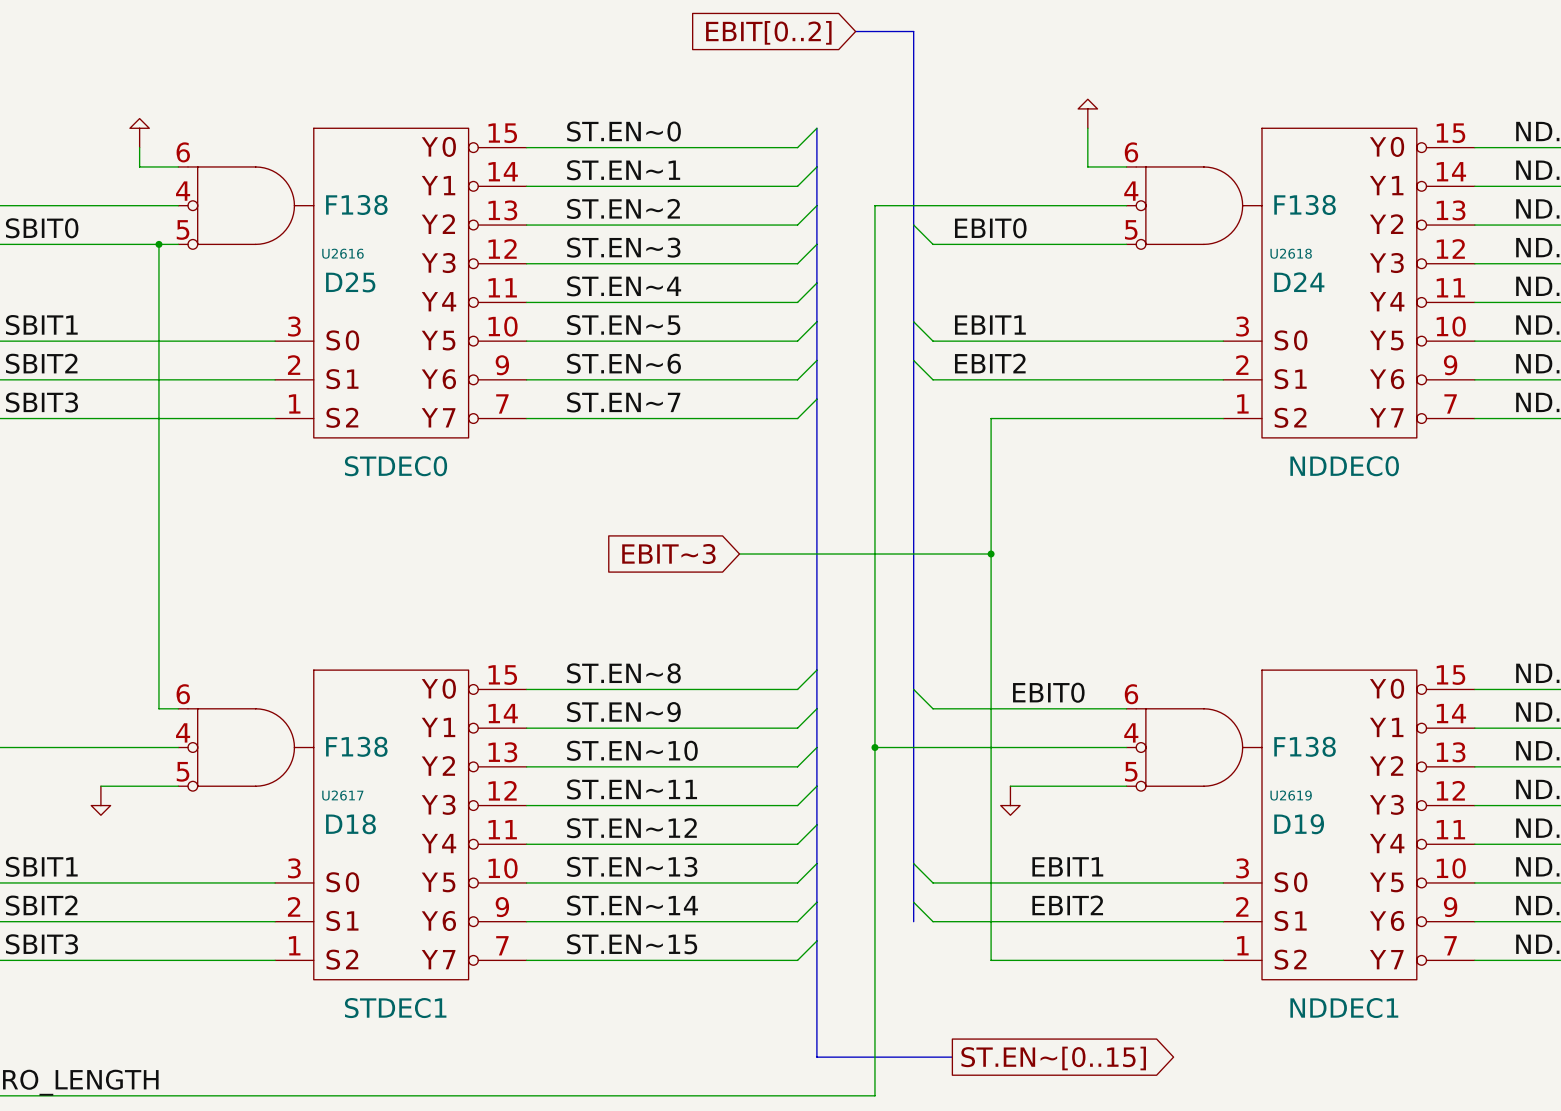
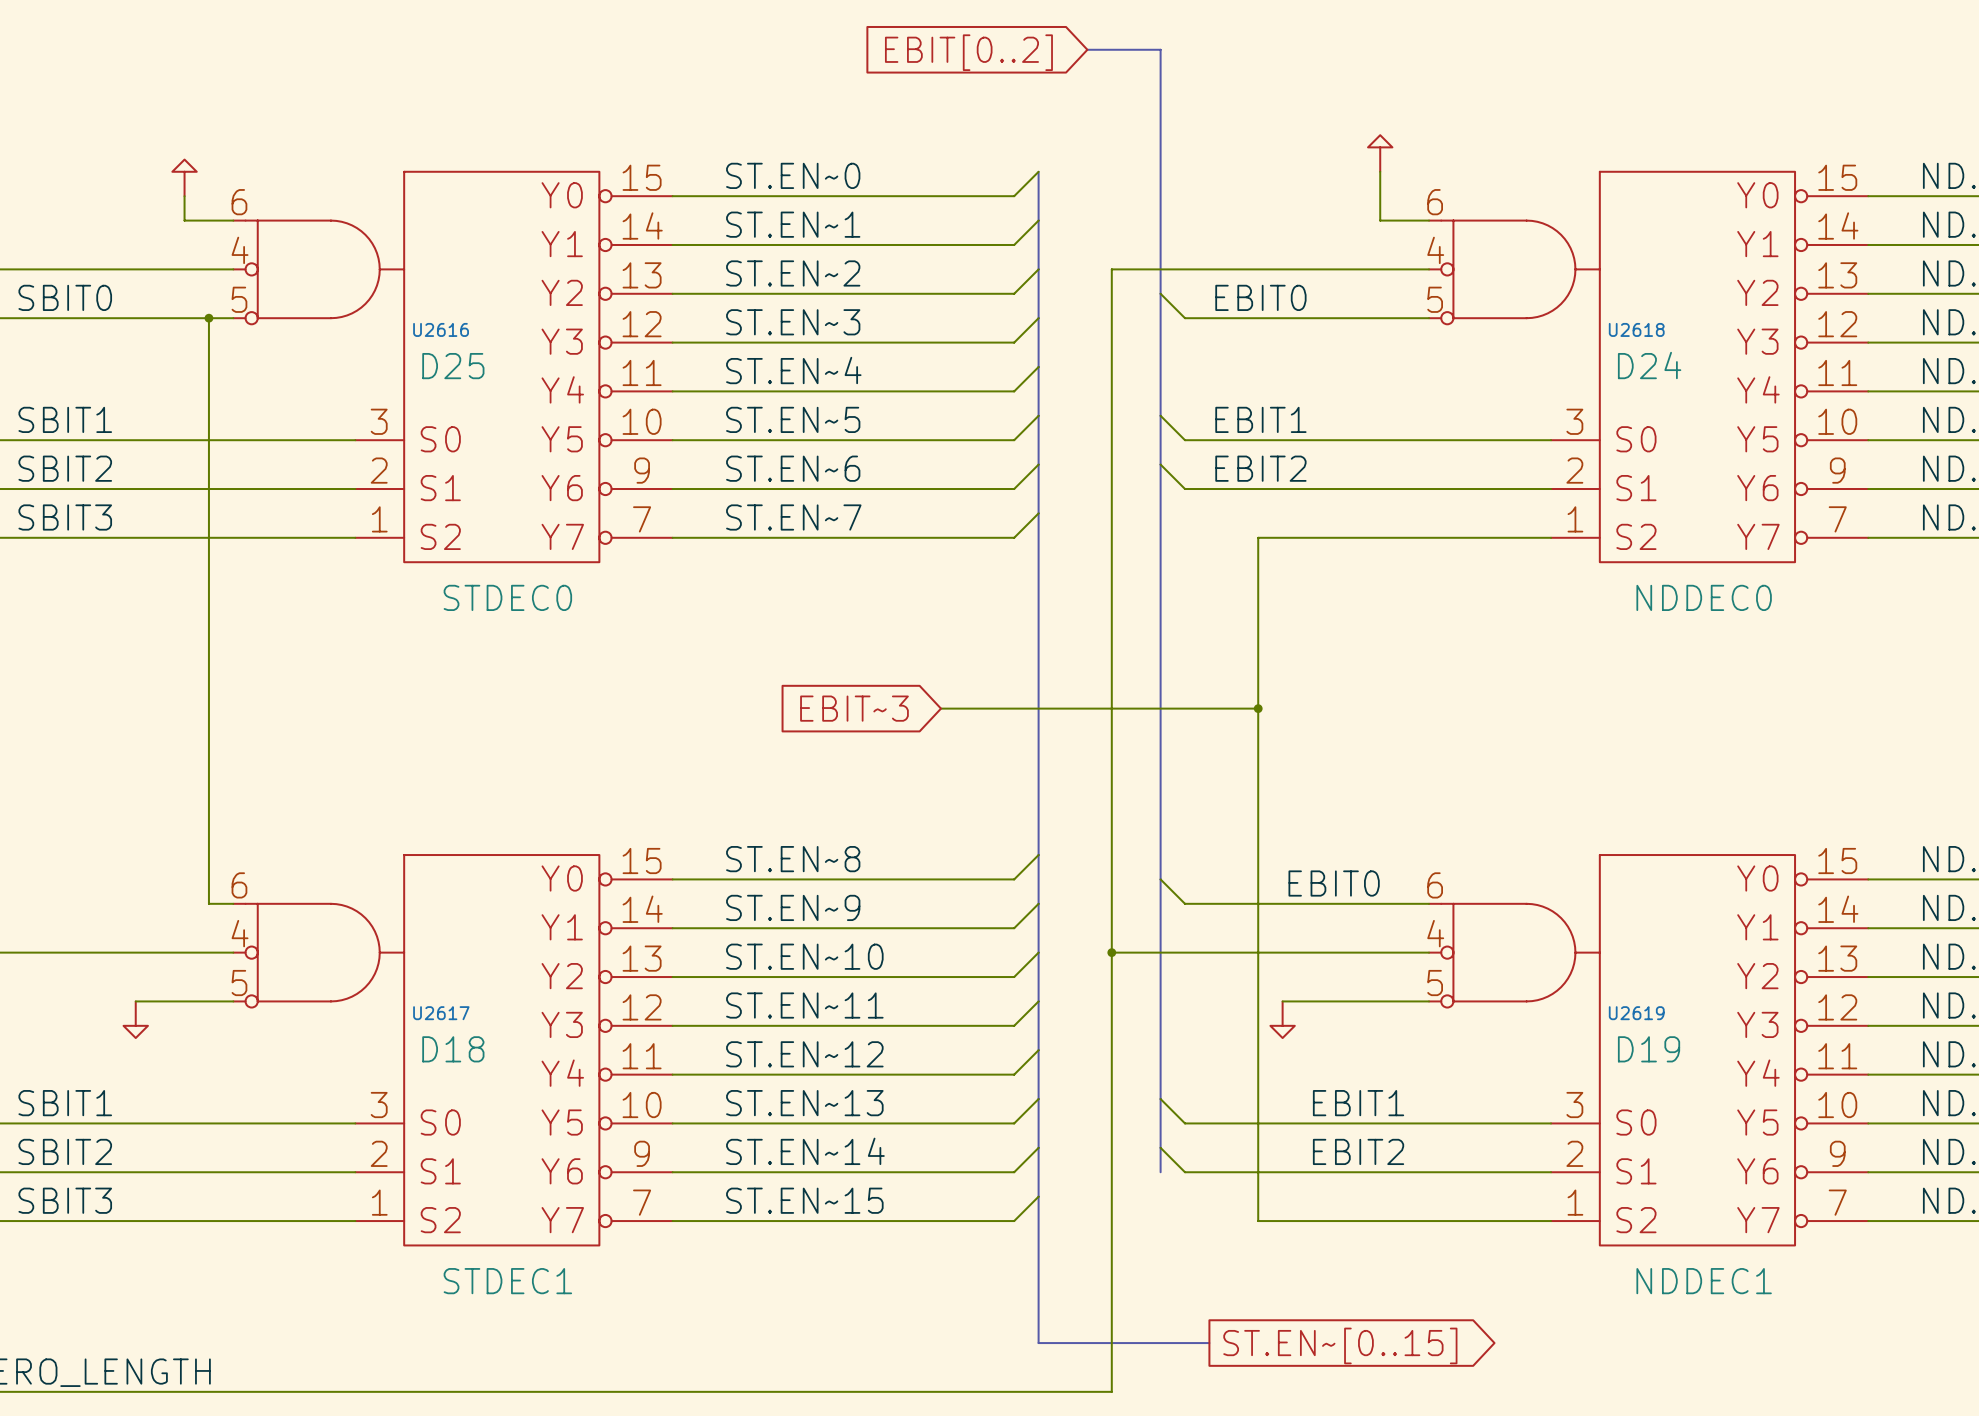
U2616 value: F138 (356, 204) -> none
U2618 value: F138 (1305, 204) -> none
U2617 value: F138 (356, 746) -> none
U2619 value: F138 (1305, 746) -> none

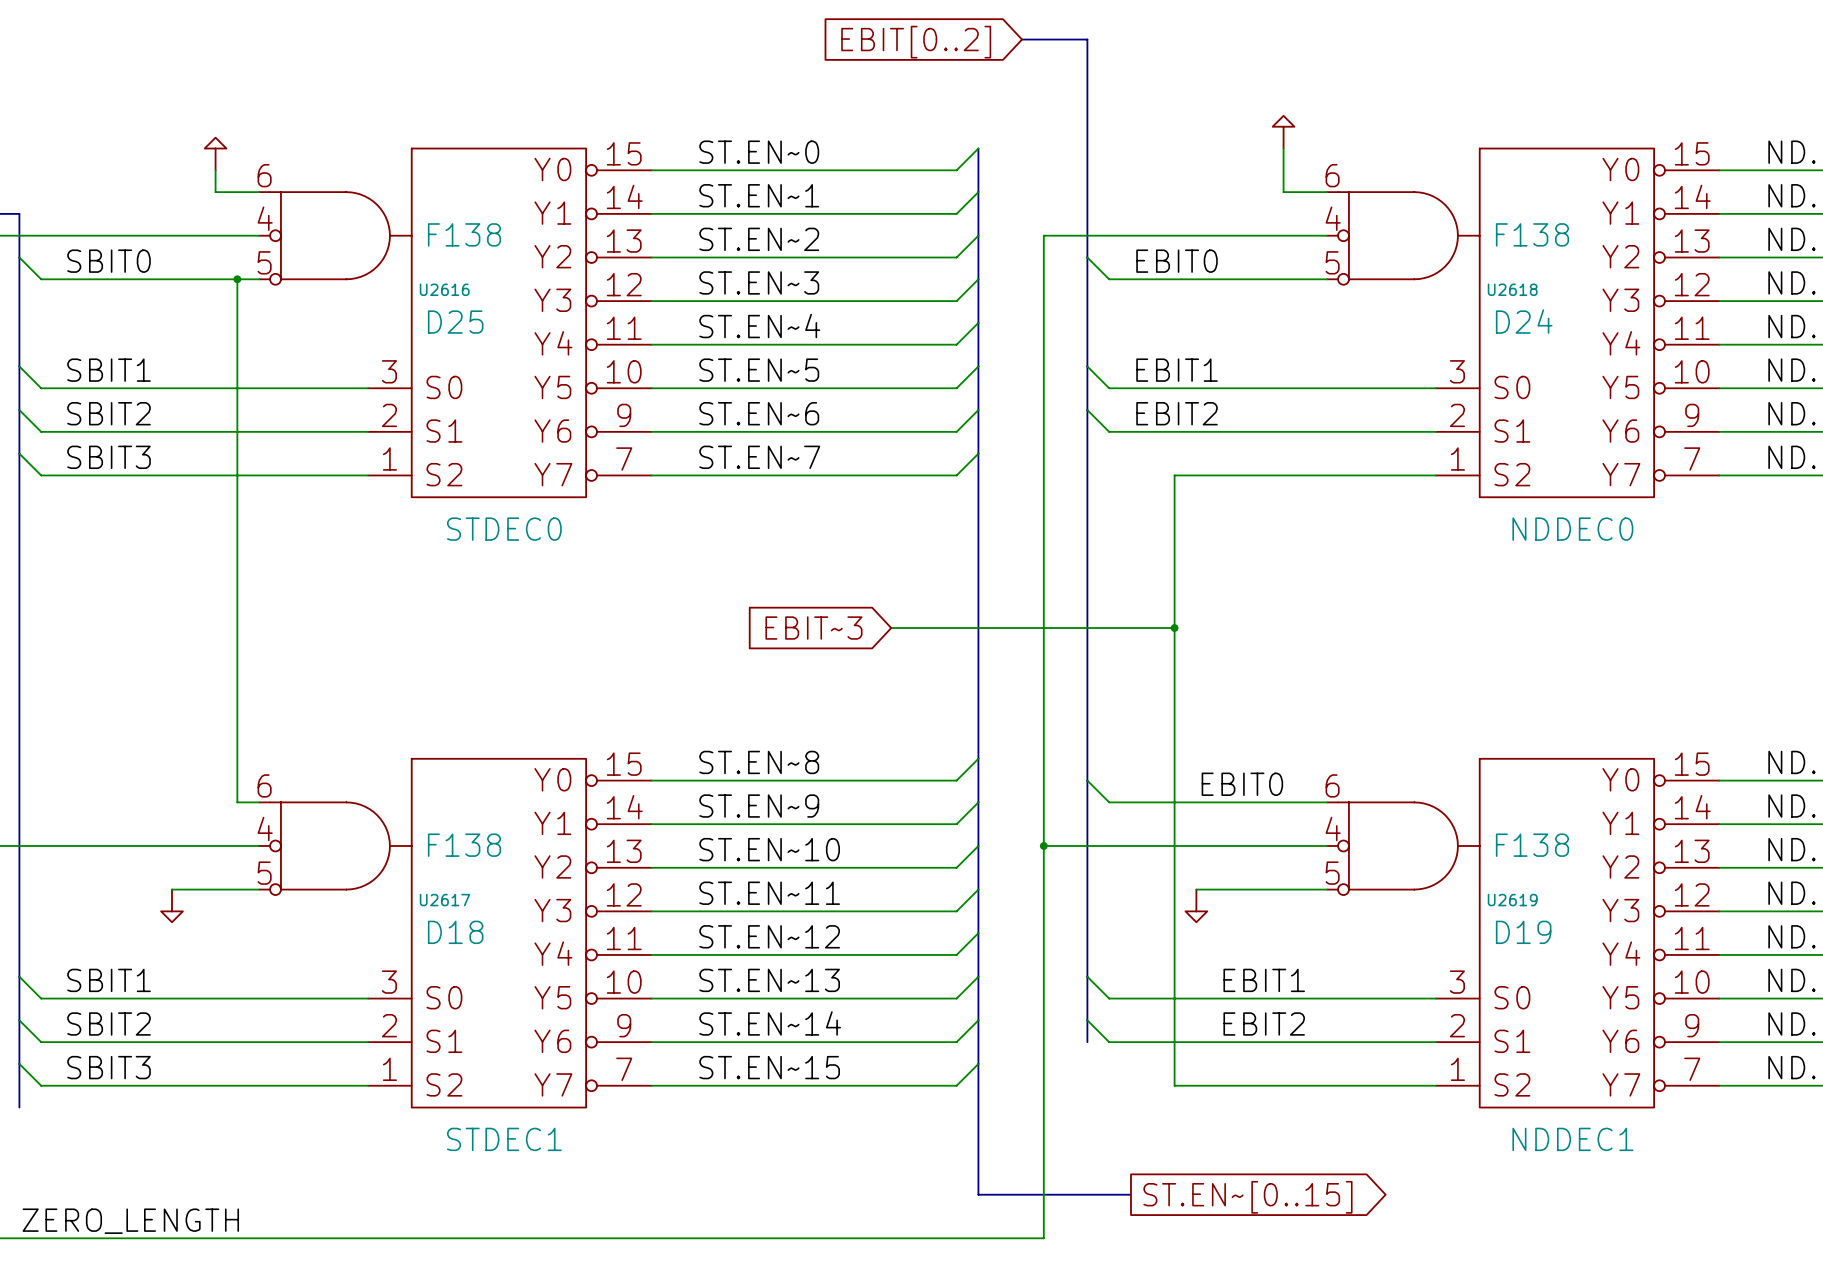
U2616 value: none -> F138 (464, 234)
U2618 value: none -> F138 (1532, 234)
U2617 value: none -> F138 (464, 845)
U2619 value: none -> F138 (1532, 845)

